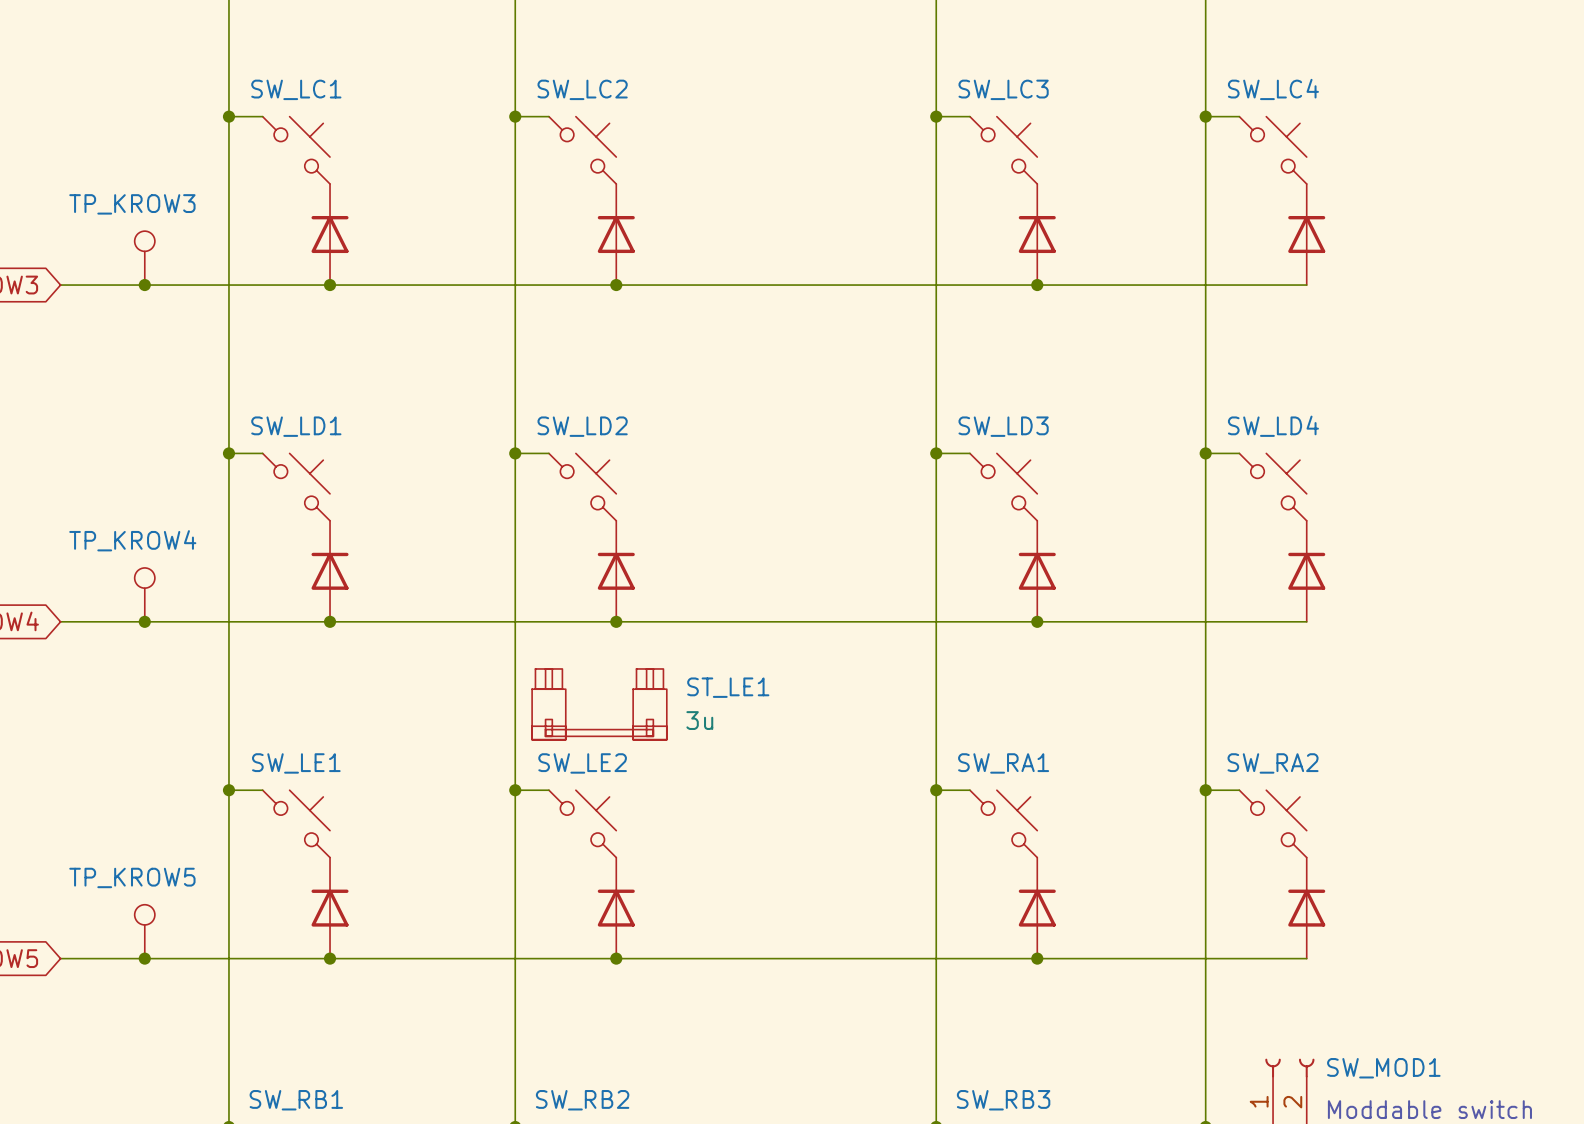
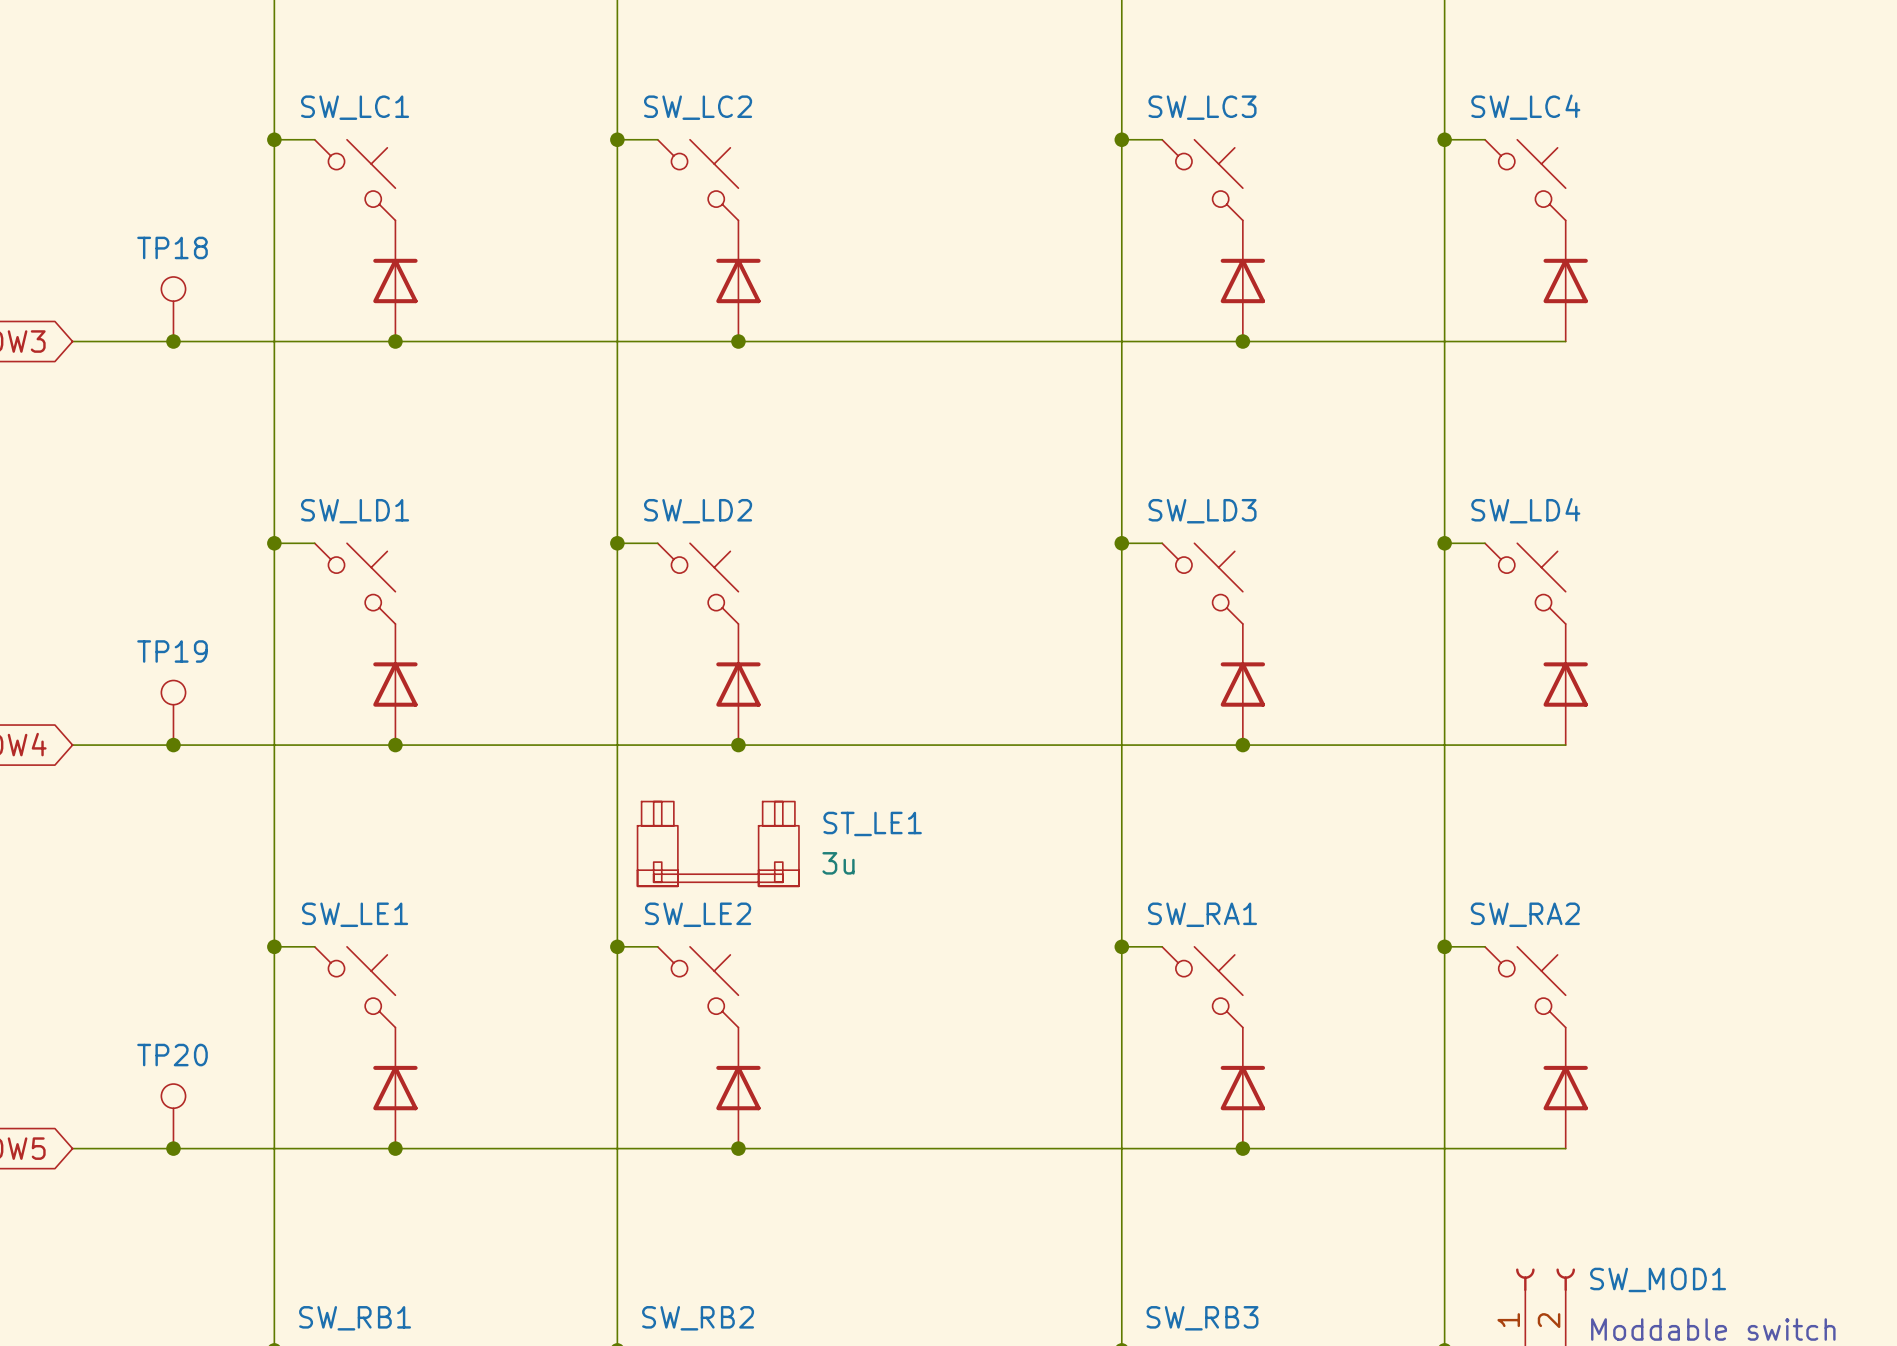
TP_KROW3 name: TP_KROW3 (132, 204) -> TP18 (172, 247)
TP_KROW4 name: TP_KROW4 (132, 540) -> TP19 (172, 651)
TP_KROW5 name: TP_KROW5 (132, 877) -> TP20 (172, 1055)

